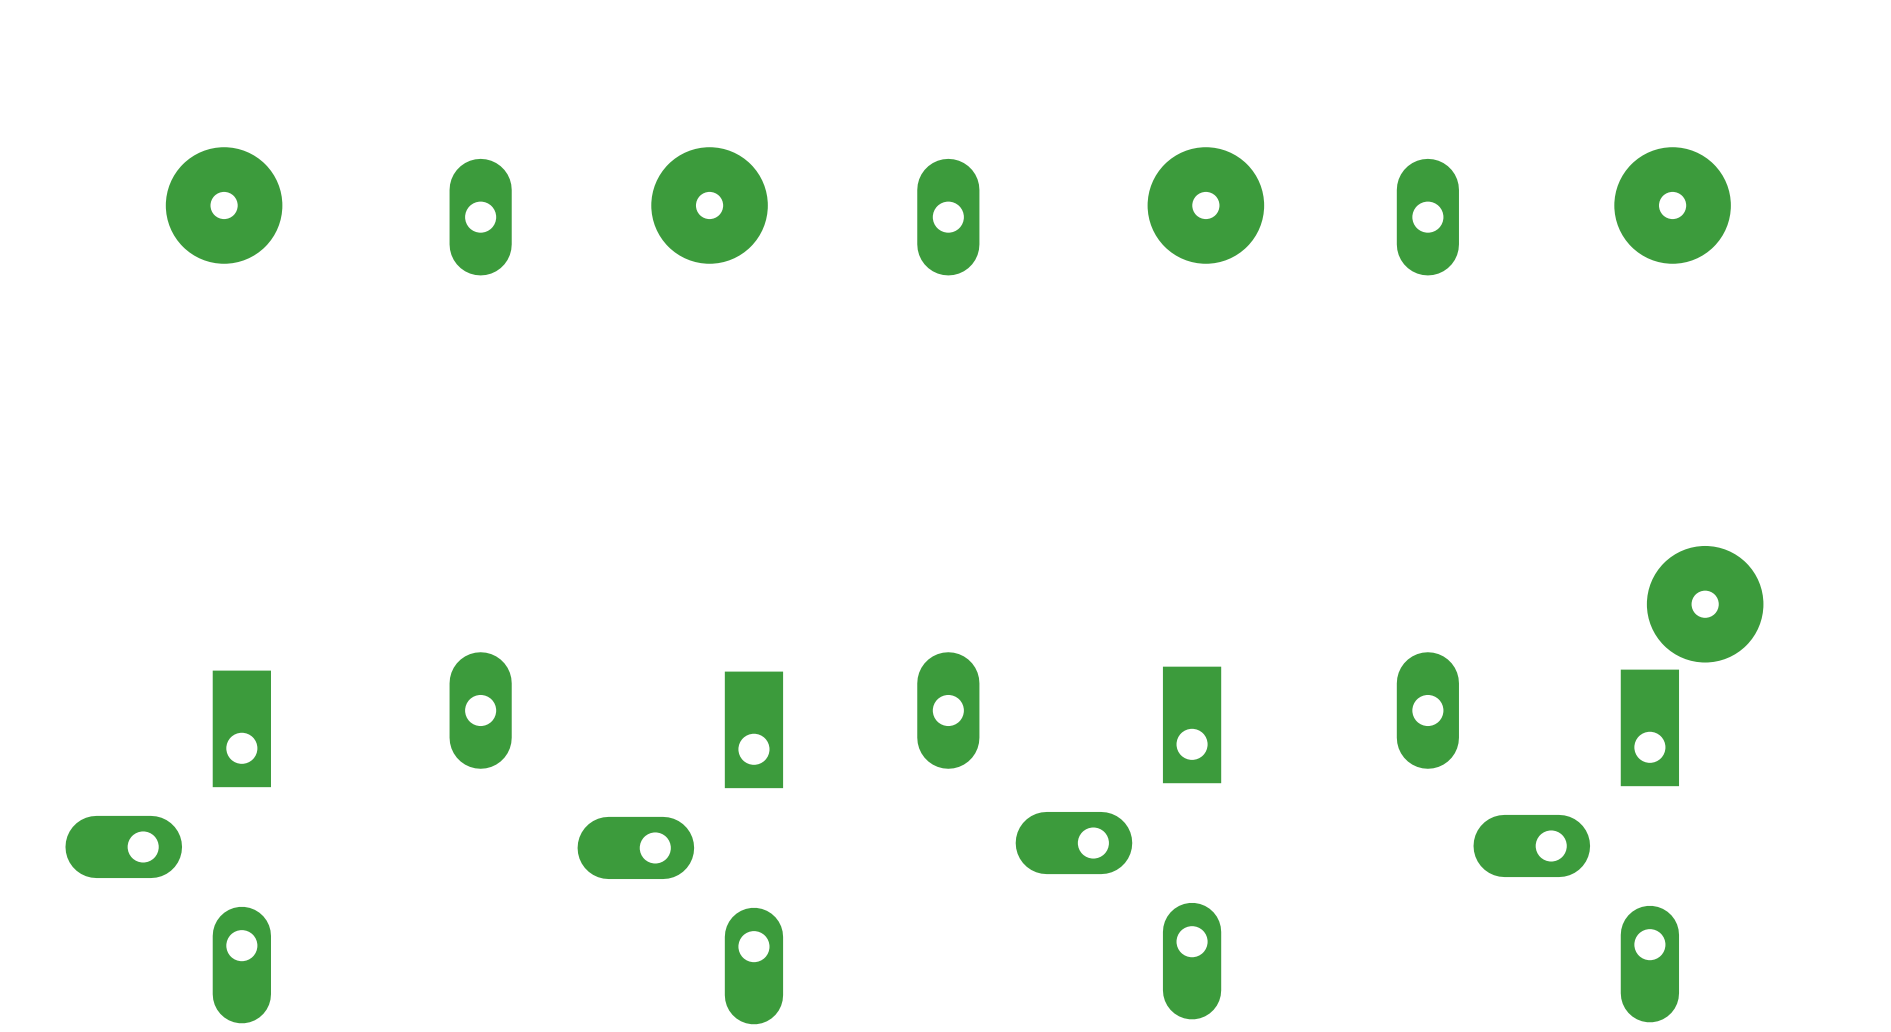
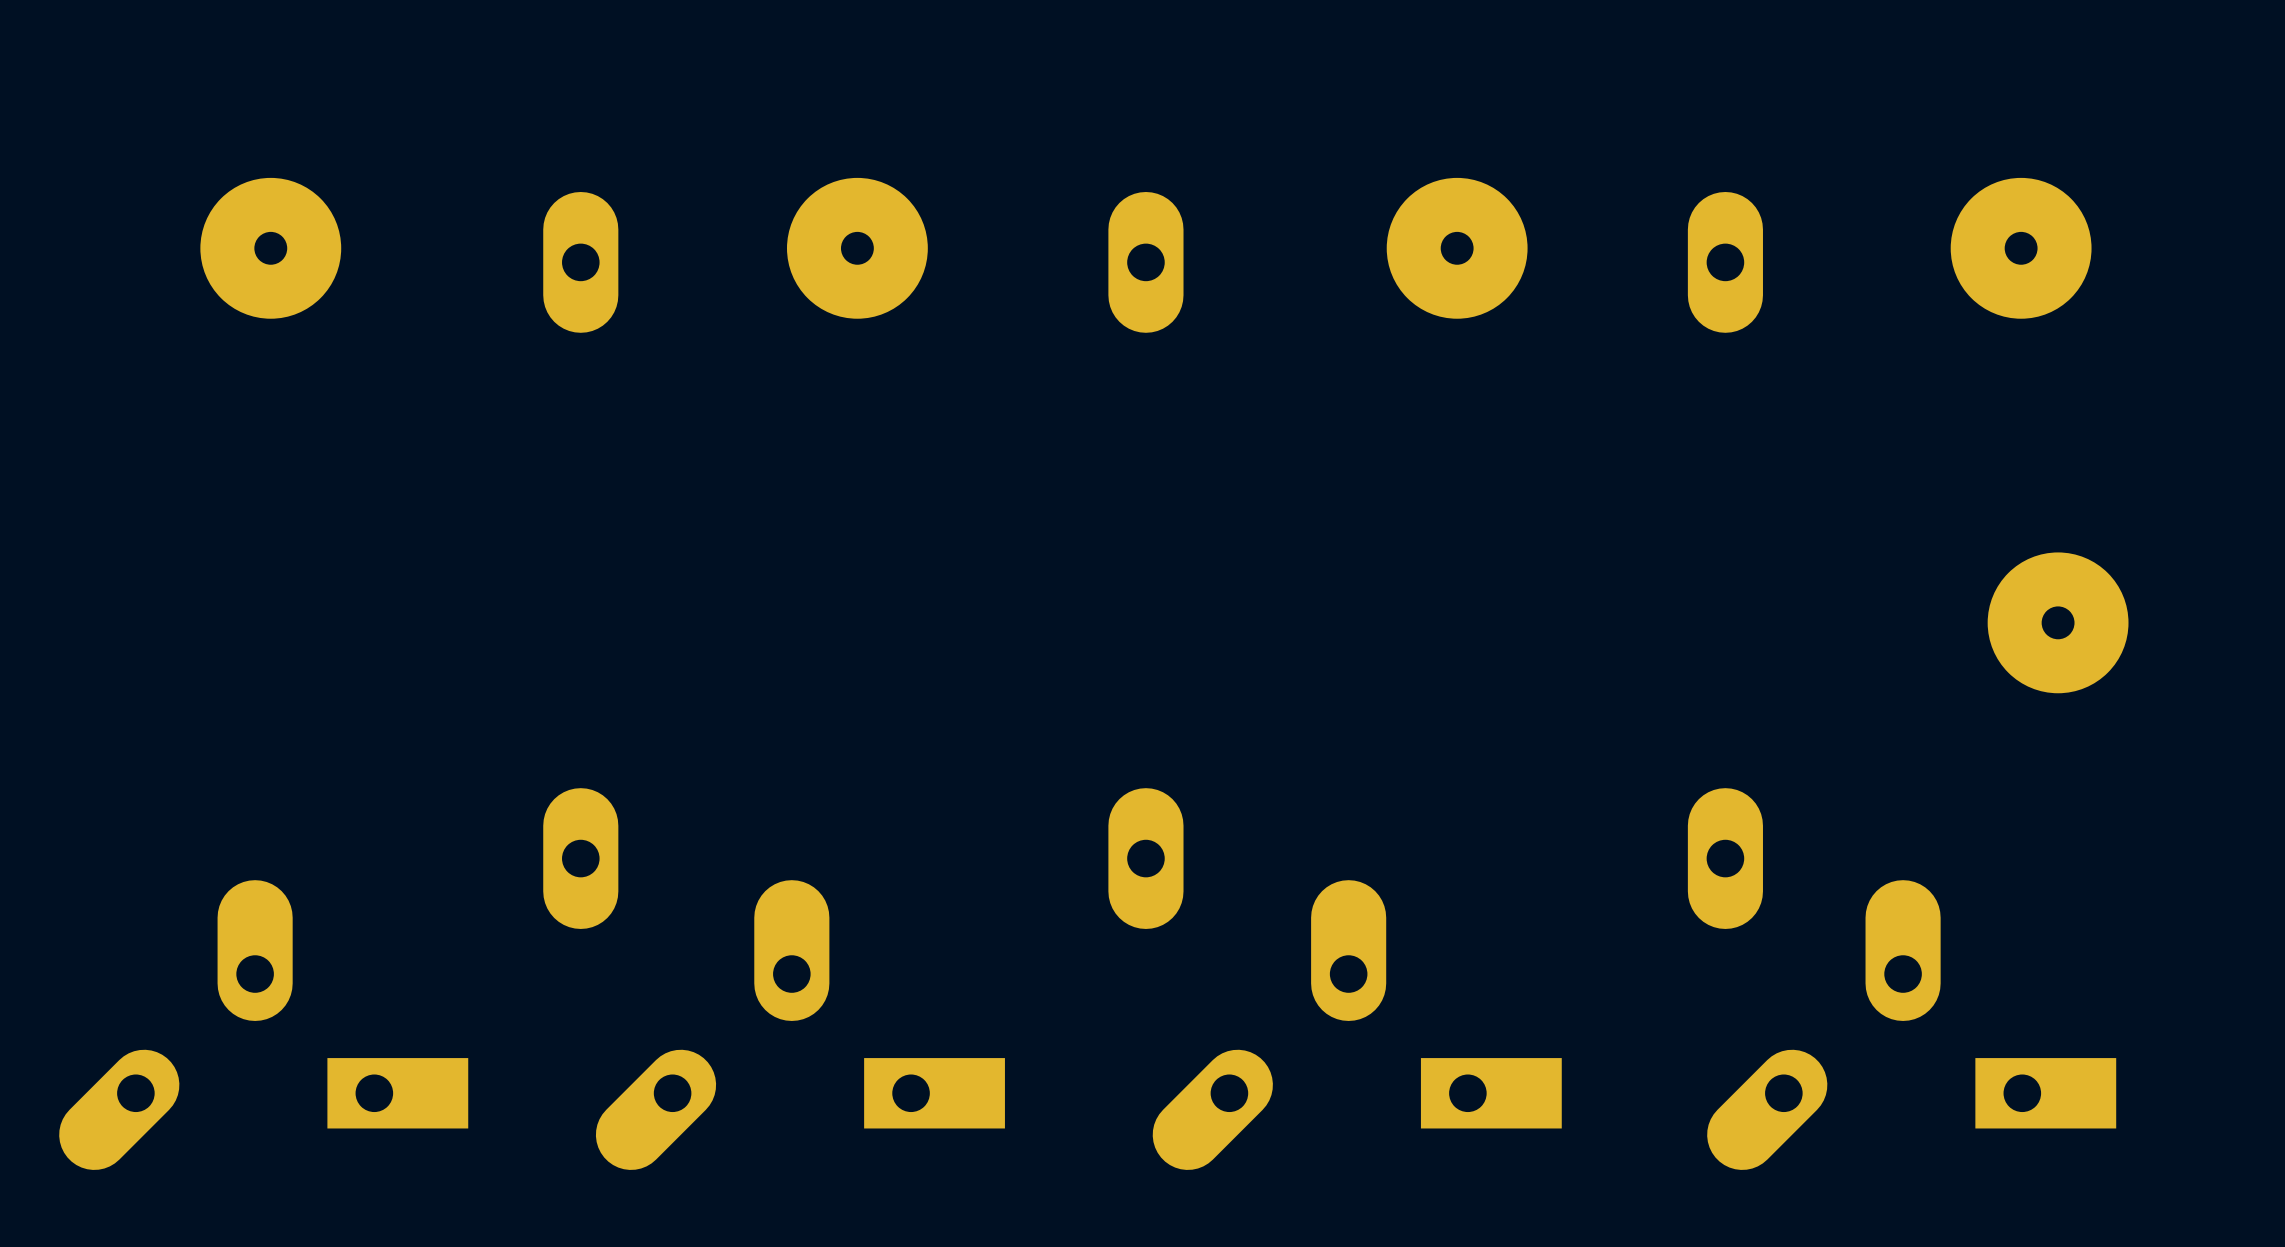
part position: (1705, 604) -> (2058, 622)
part footprint: [1015, 666, 1222, 1020] -> [1152, 880, 1562, 1170]
part footprint: [1473, 669, 1680, 1023] -> [1707, 880, 2117, 1170]
part footprint: [577, 671, 784, 1025] -> [595, 880, 1005, 1170]
part: (168, 846) -> none
part: none -> (263, 1025)

